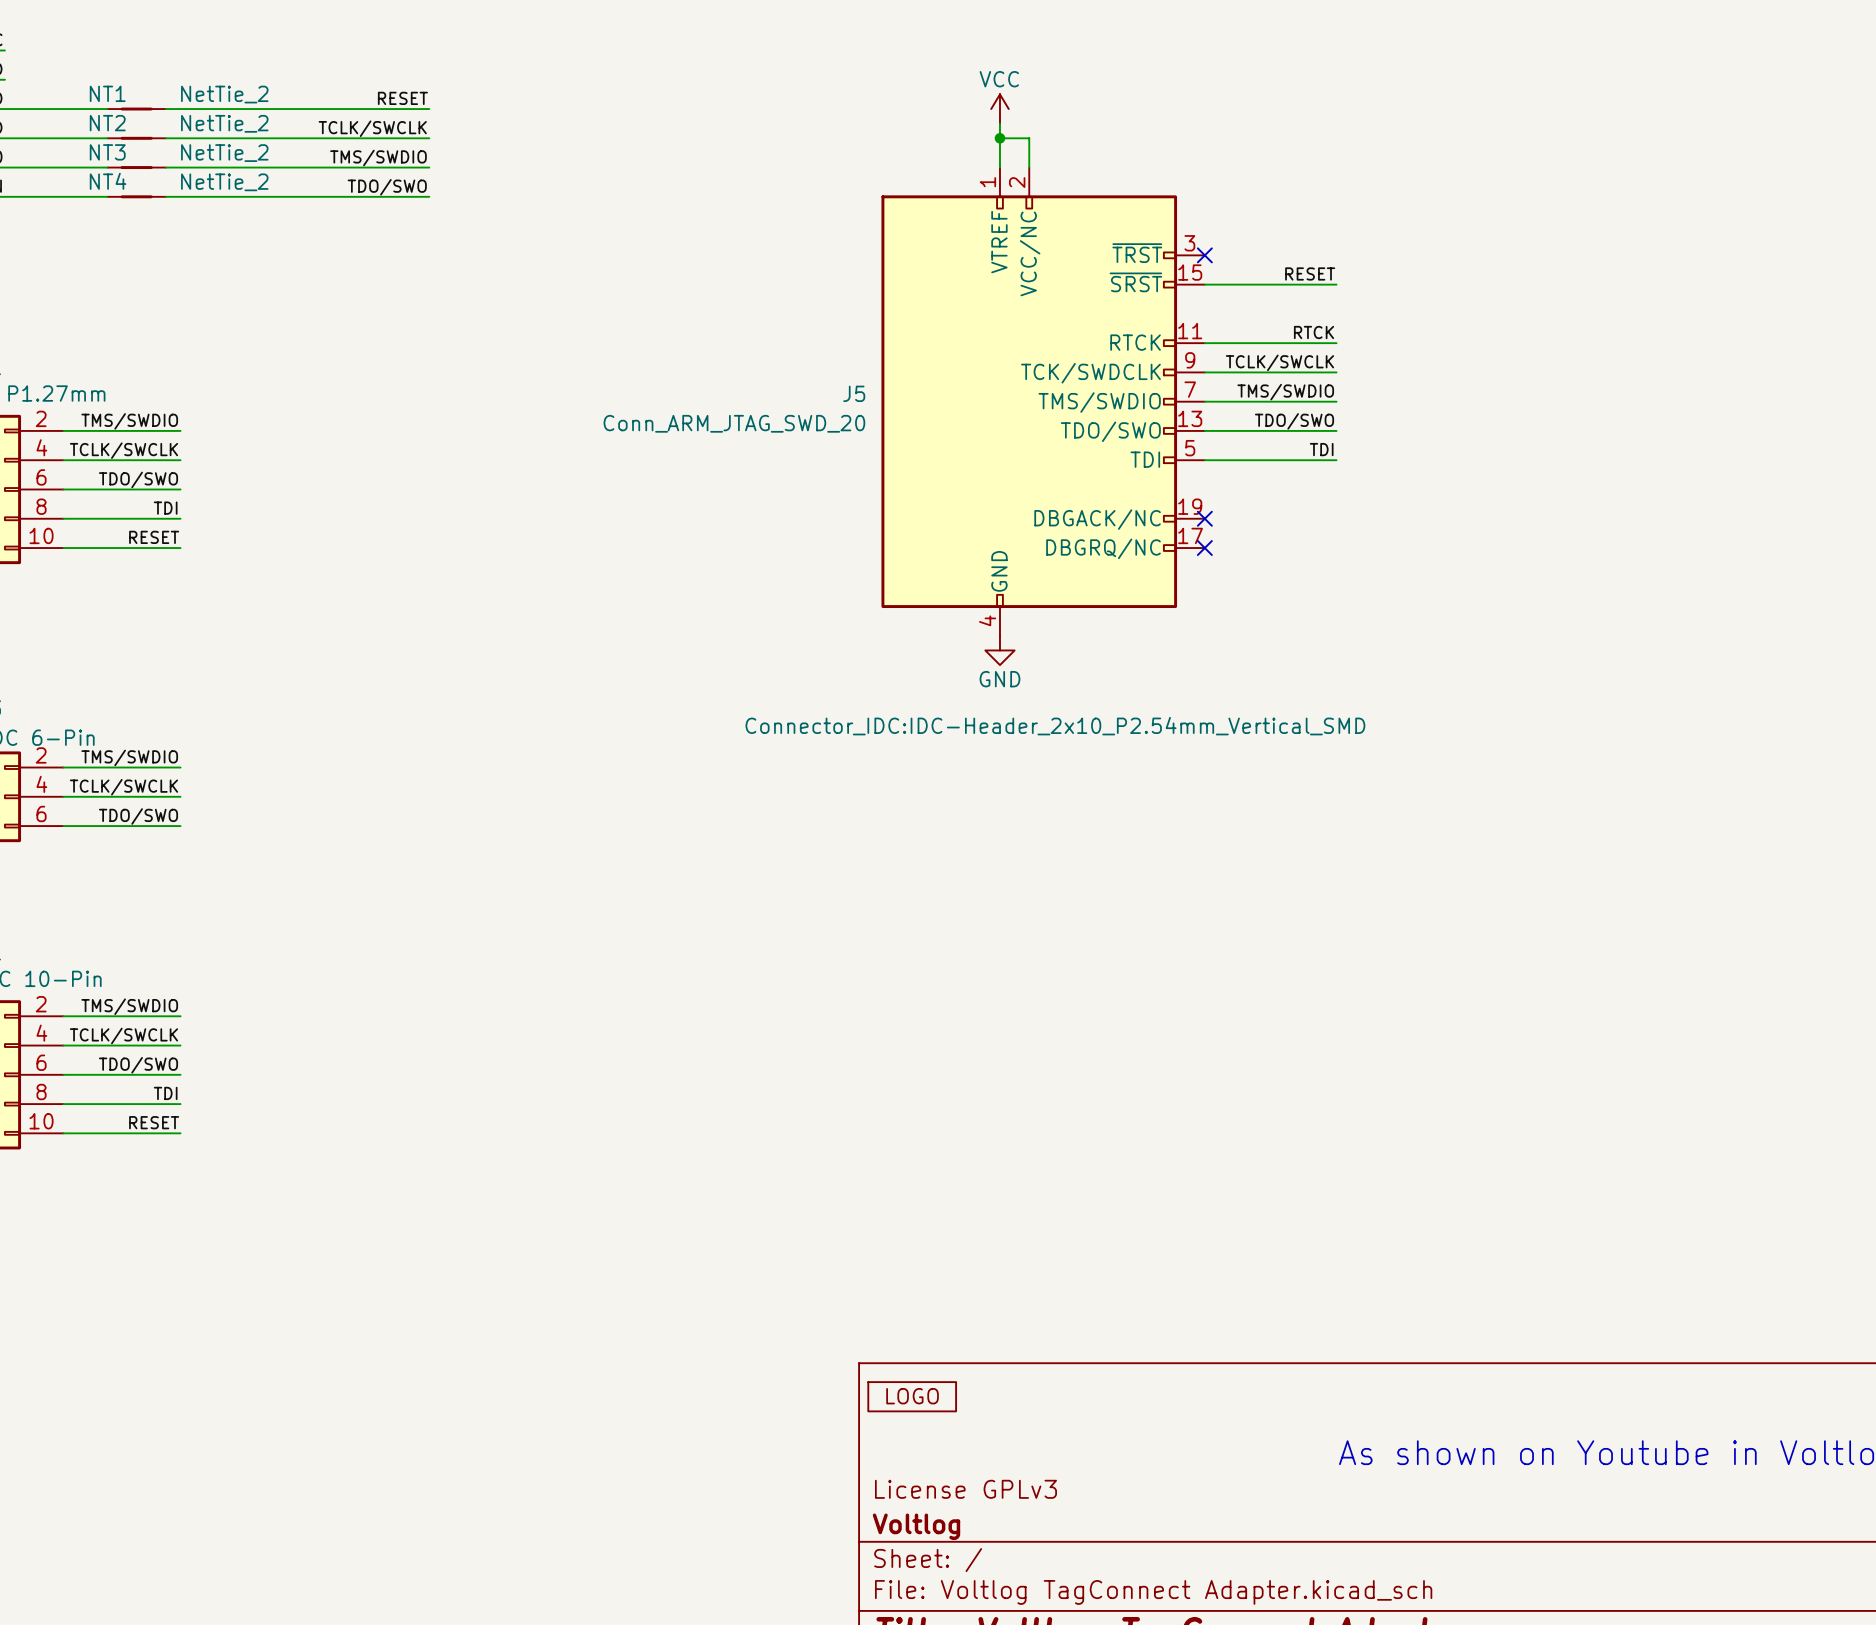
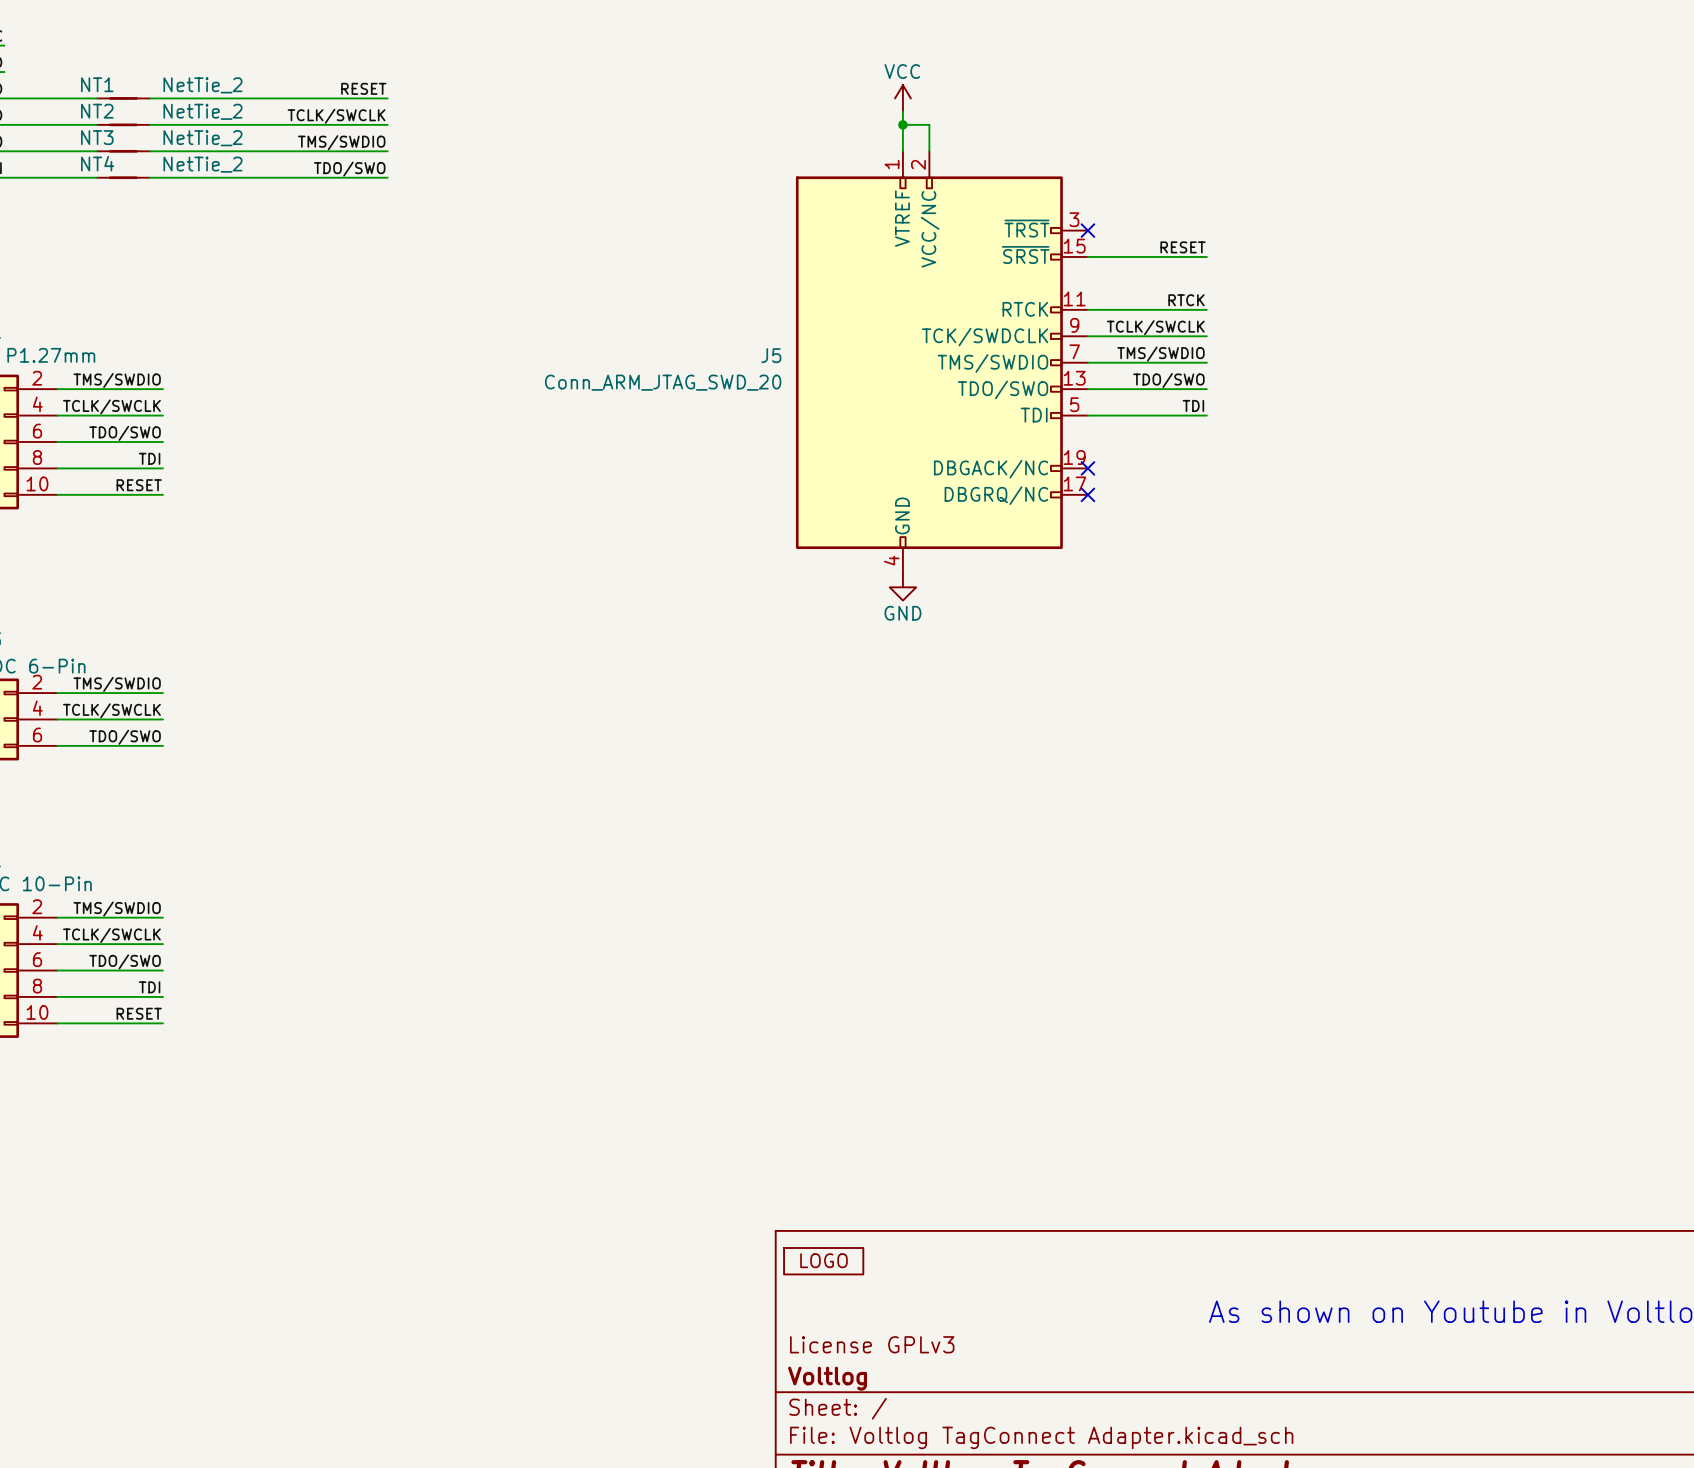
J5 text: Connector_IDC:IDC-Header_2x10_P2.54mm_Vertical_SMD (1055, 726) -> none

